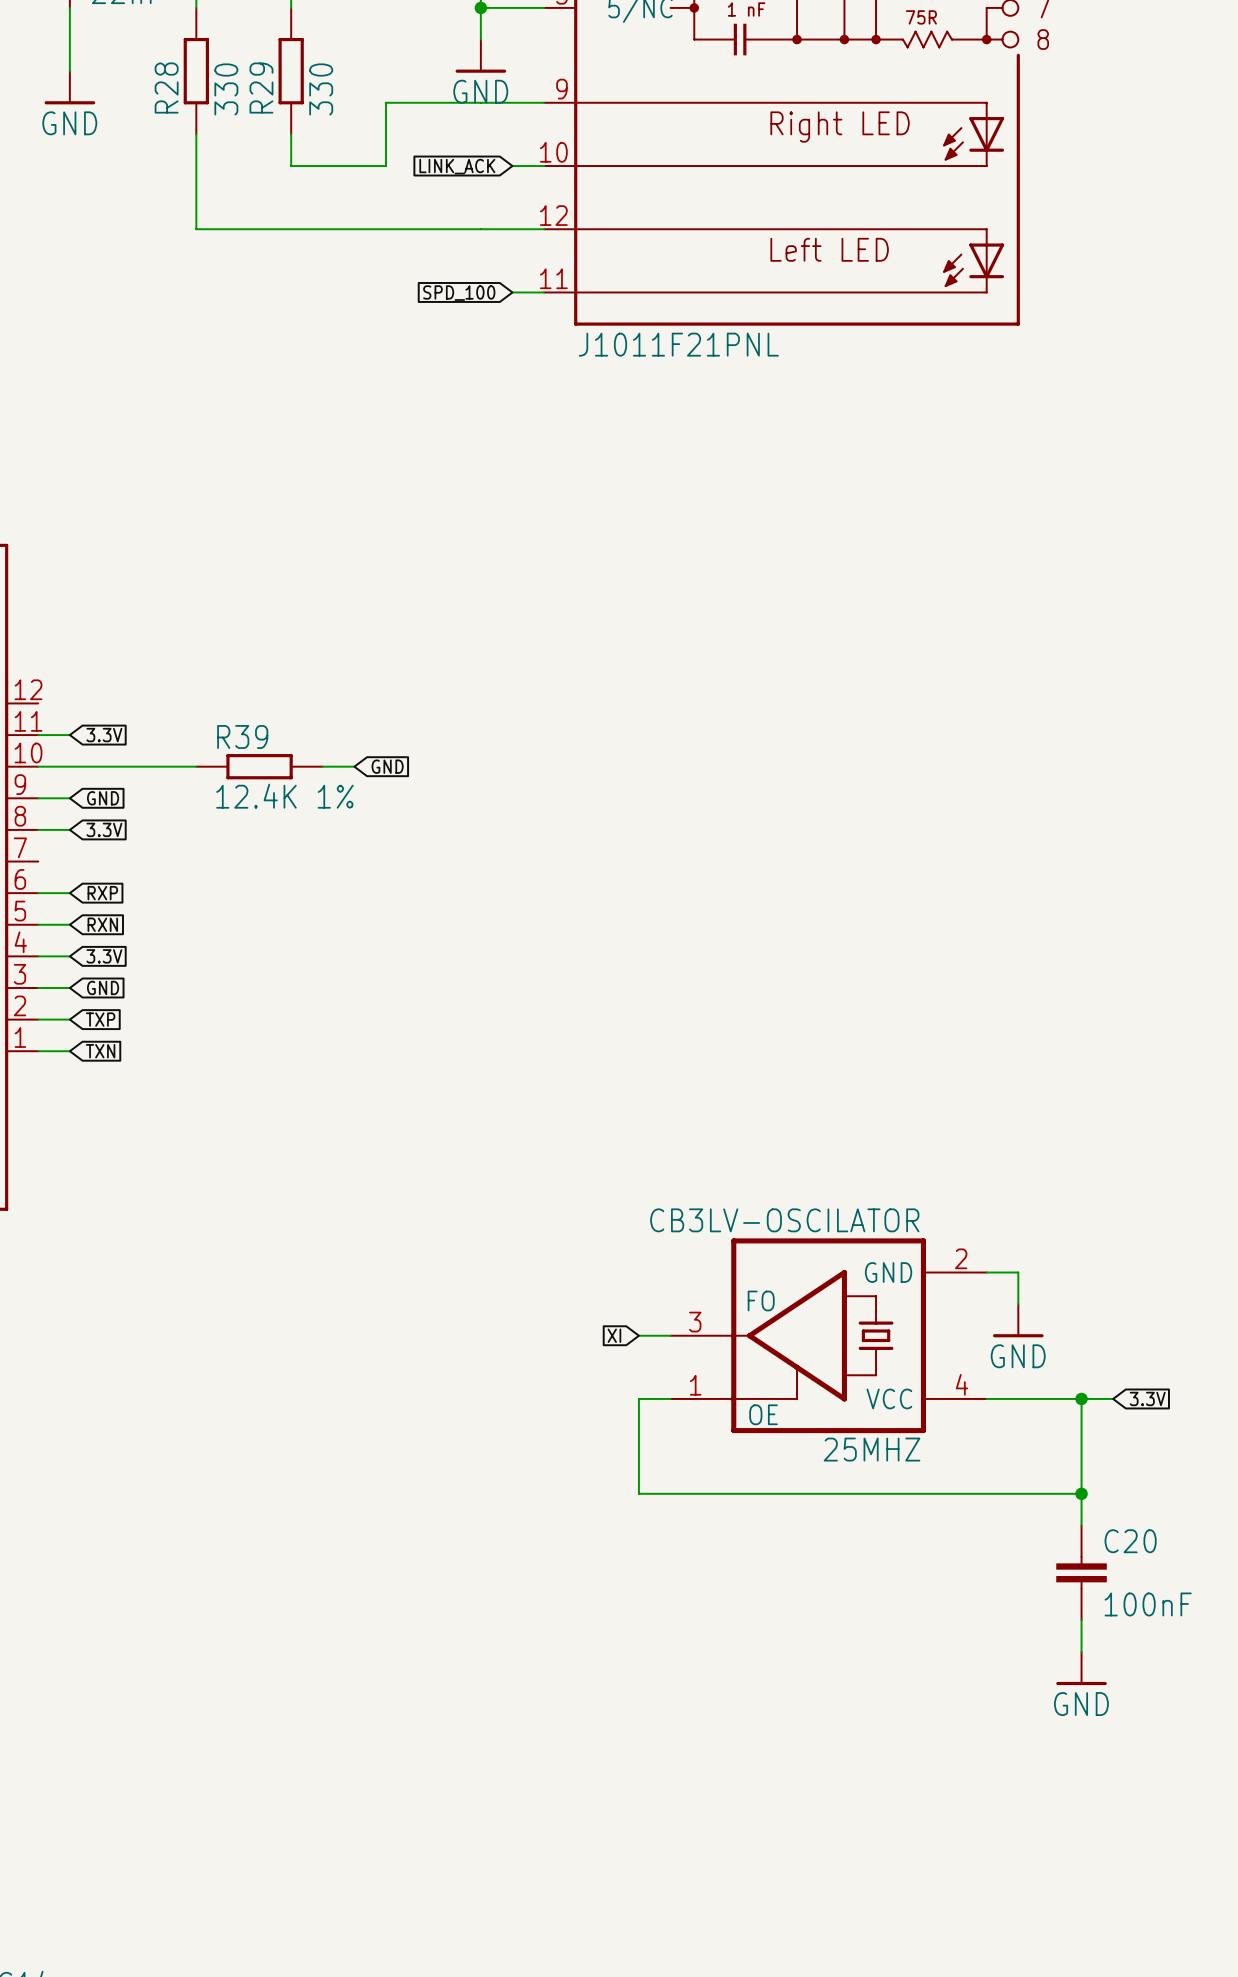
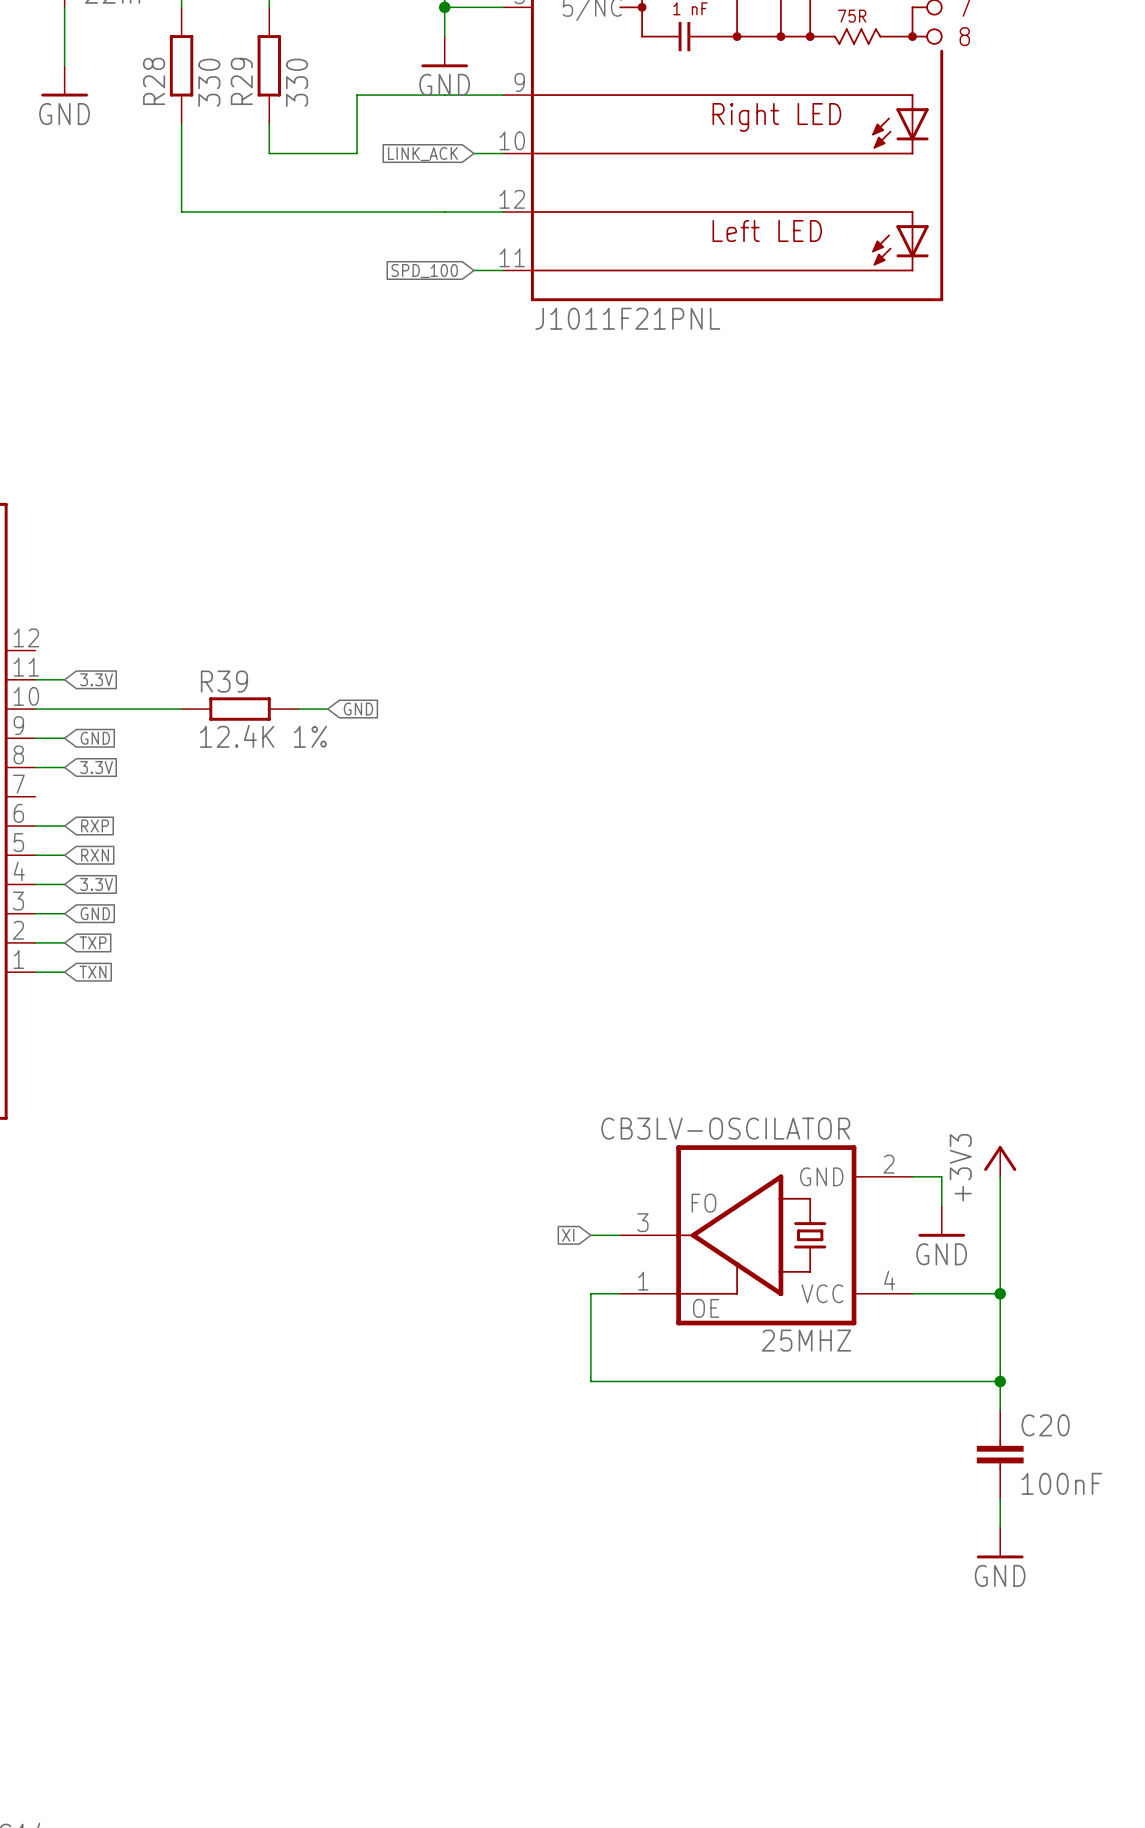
power symbol: none -> +3V3 (1000, 1161)
wire: (1081, 1398) (1113, 1398) -> (1000, 1293) (1000, 1176)
global label: 3.3V (1147, 1398) -> none

